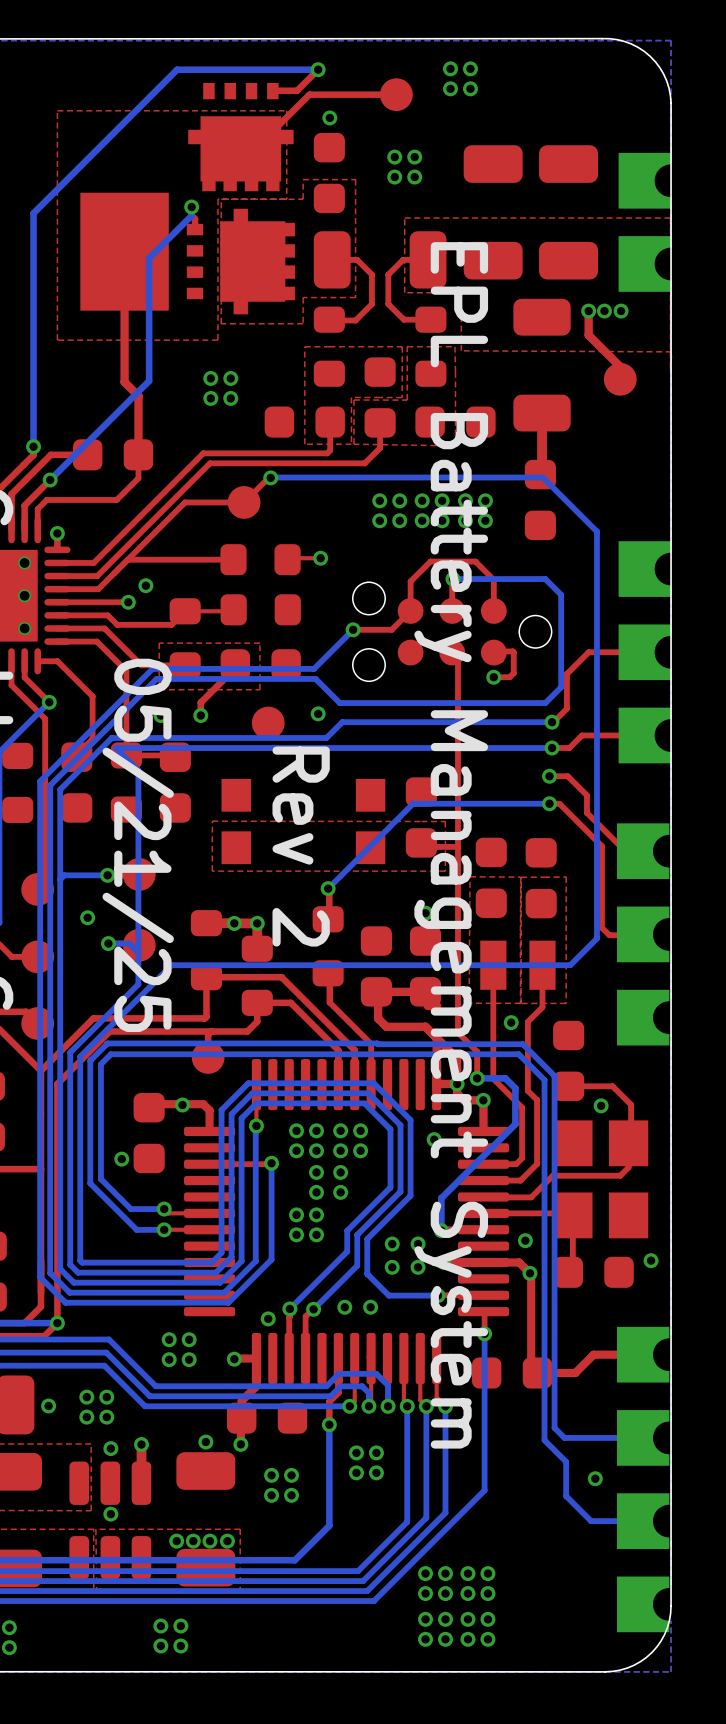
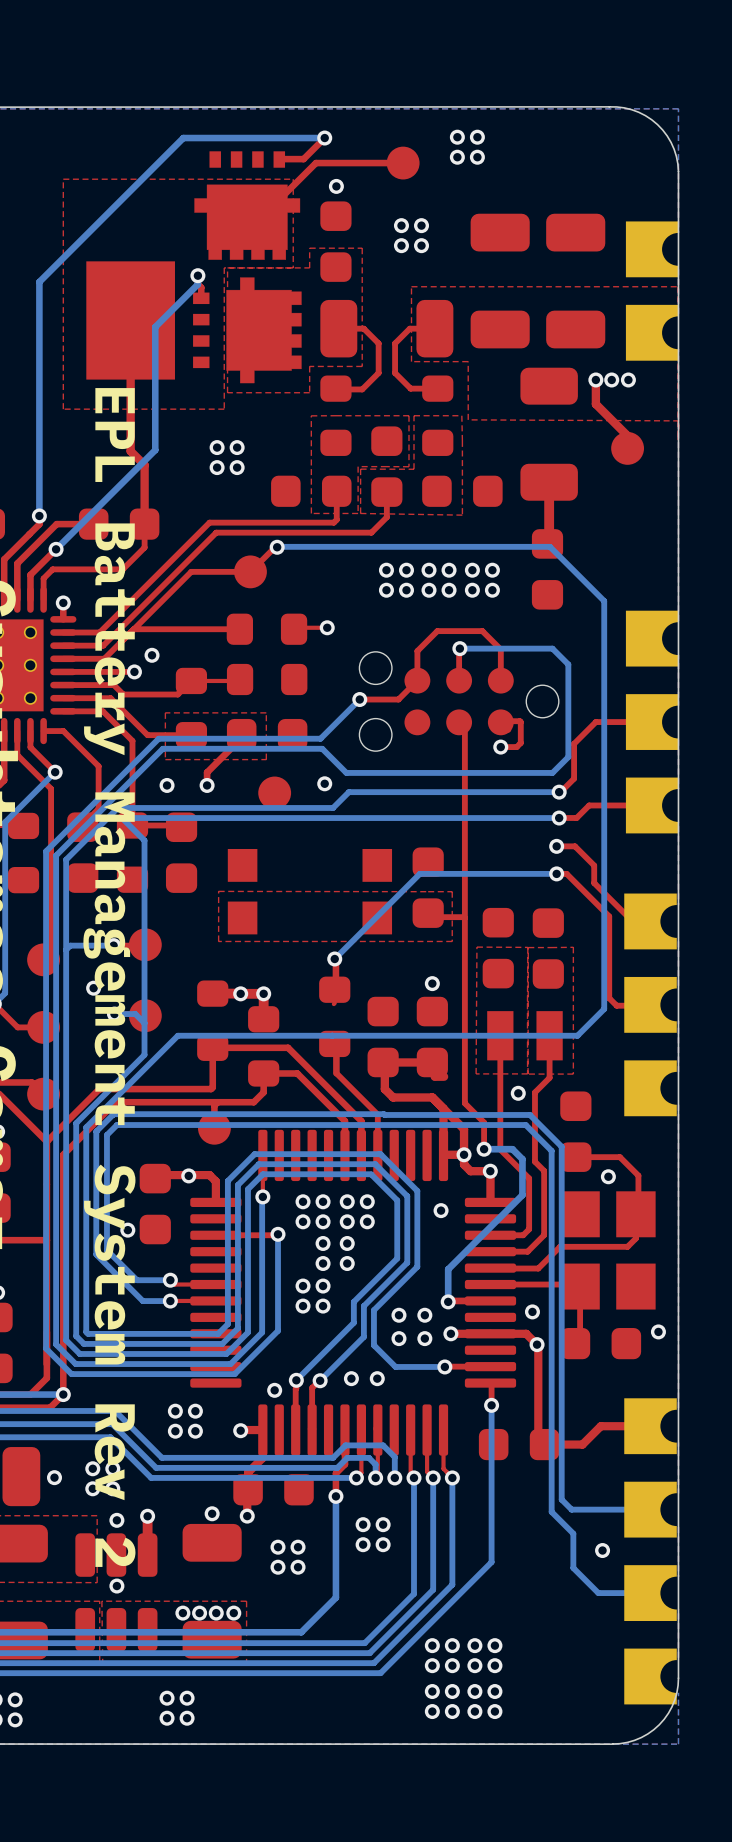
text: 05/21/25 (138, 845) -> none
text: EPL Battery Management System (451, 845) -> none
text: Rev 2 (301, 846) -> none
text: none -> EPL Battery Management System Rev 2 (109, 977)

